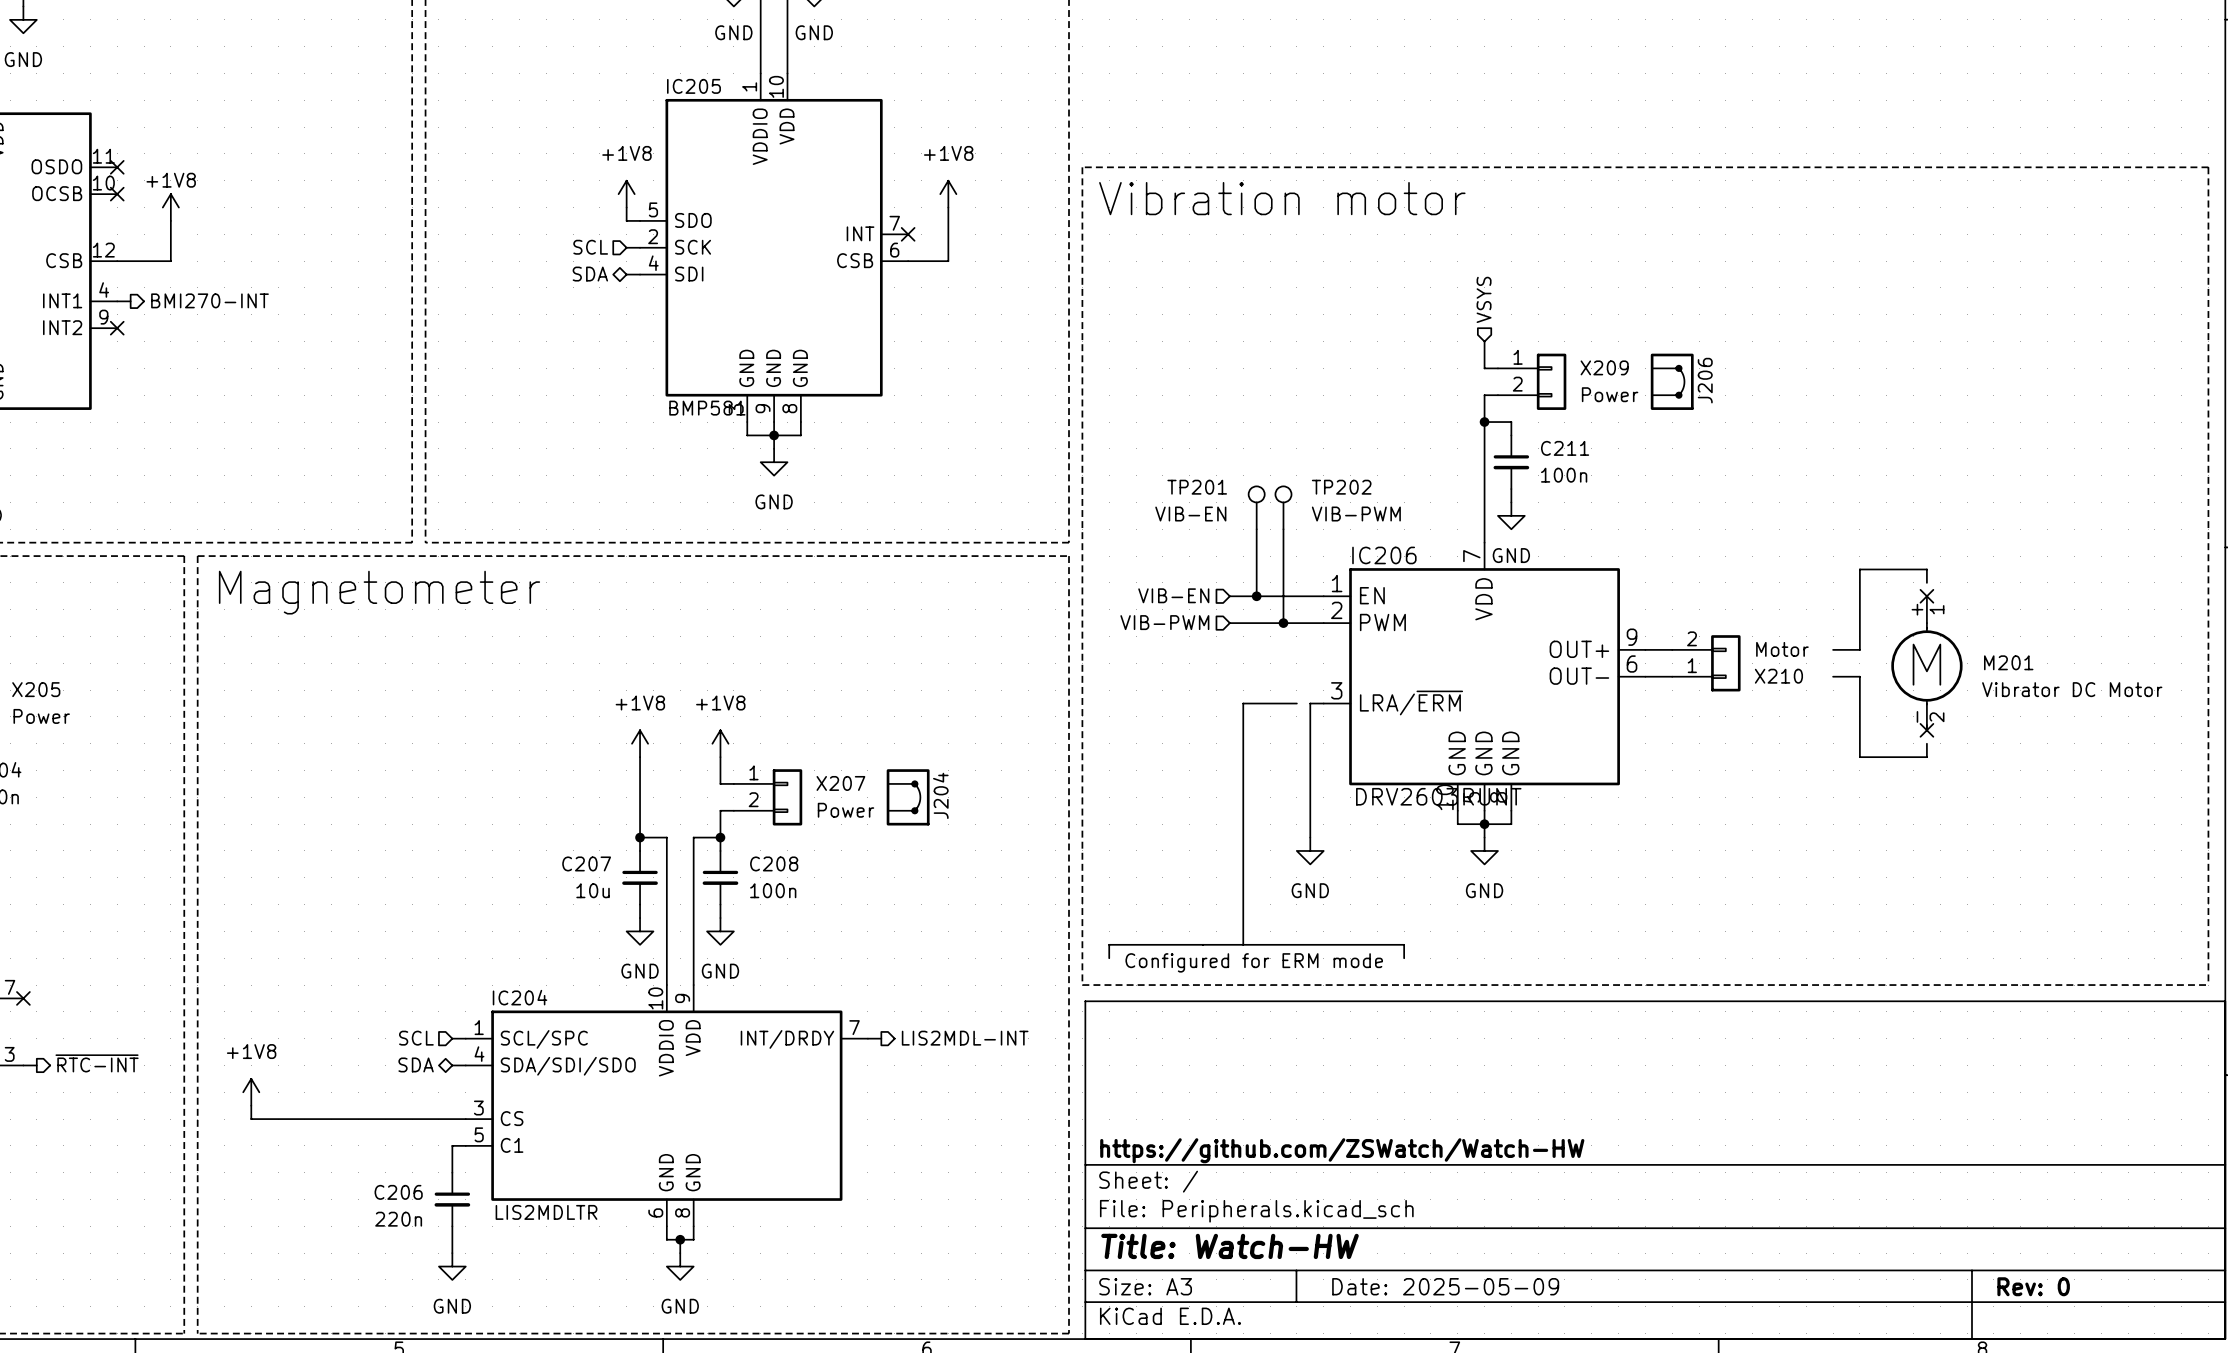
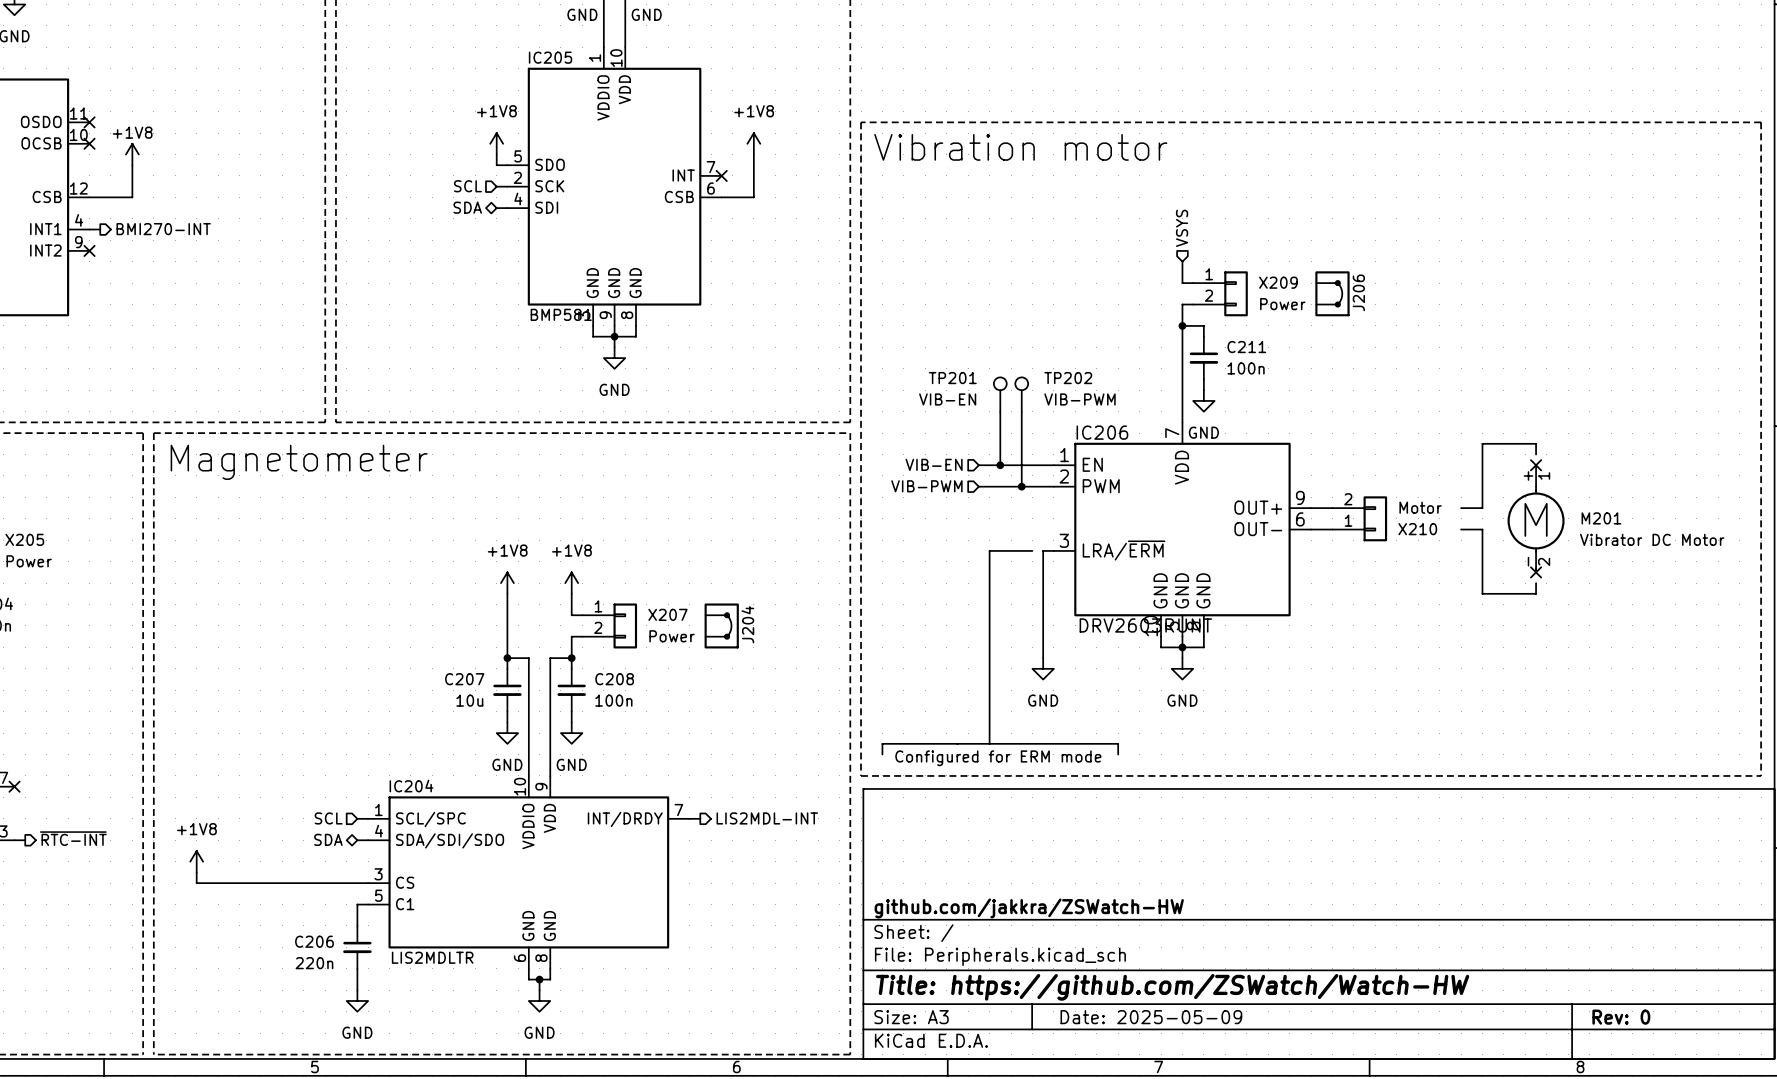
title block: https://github.com/ZSWatch/Watch-HW (1342, 1150) -> github.com/jakkra/ZSWatch-HW (1029, 908)
title block: Title: Watch-HW (1230, 1246) -> Title: https://github.com/ZSWatch/Watch-HW (1172, 987)

